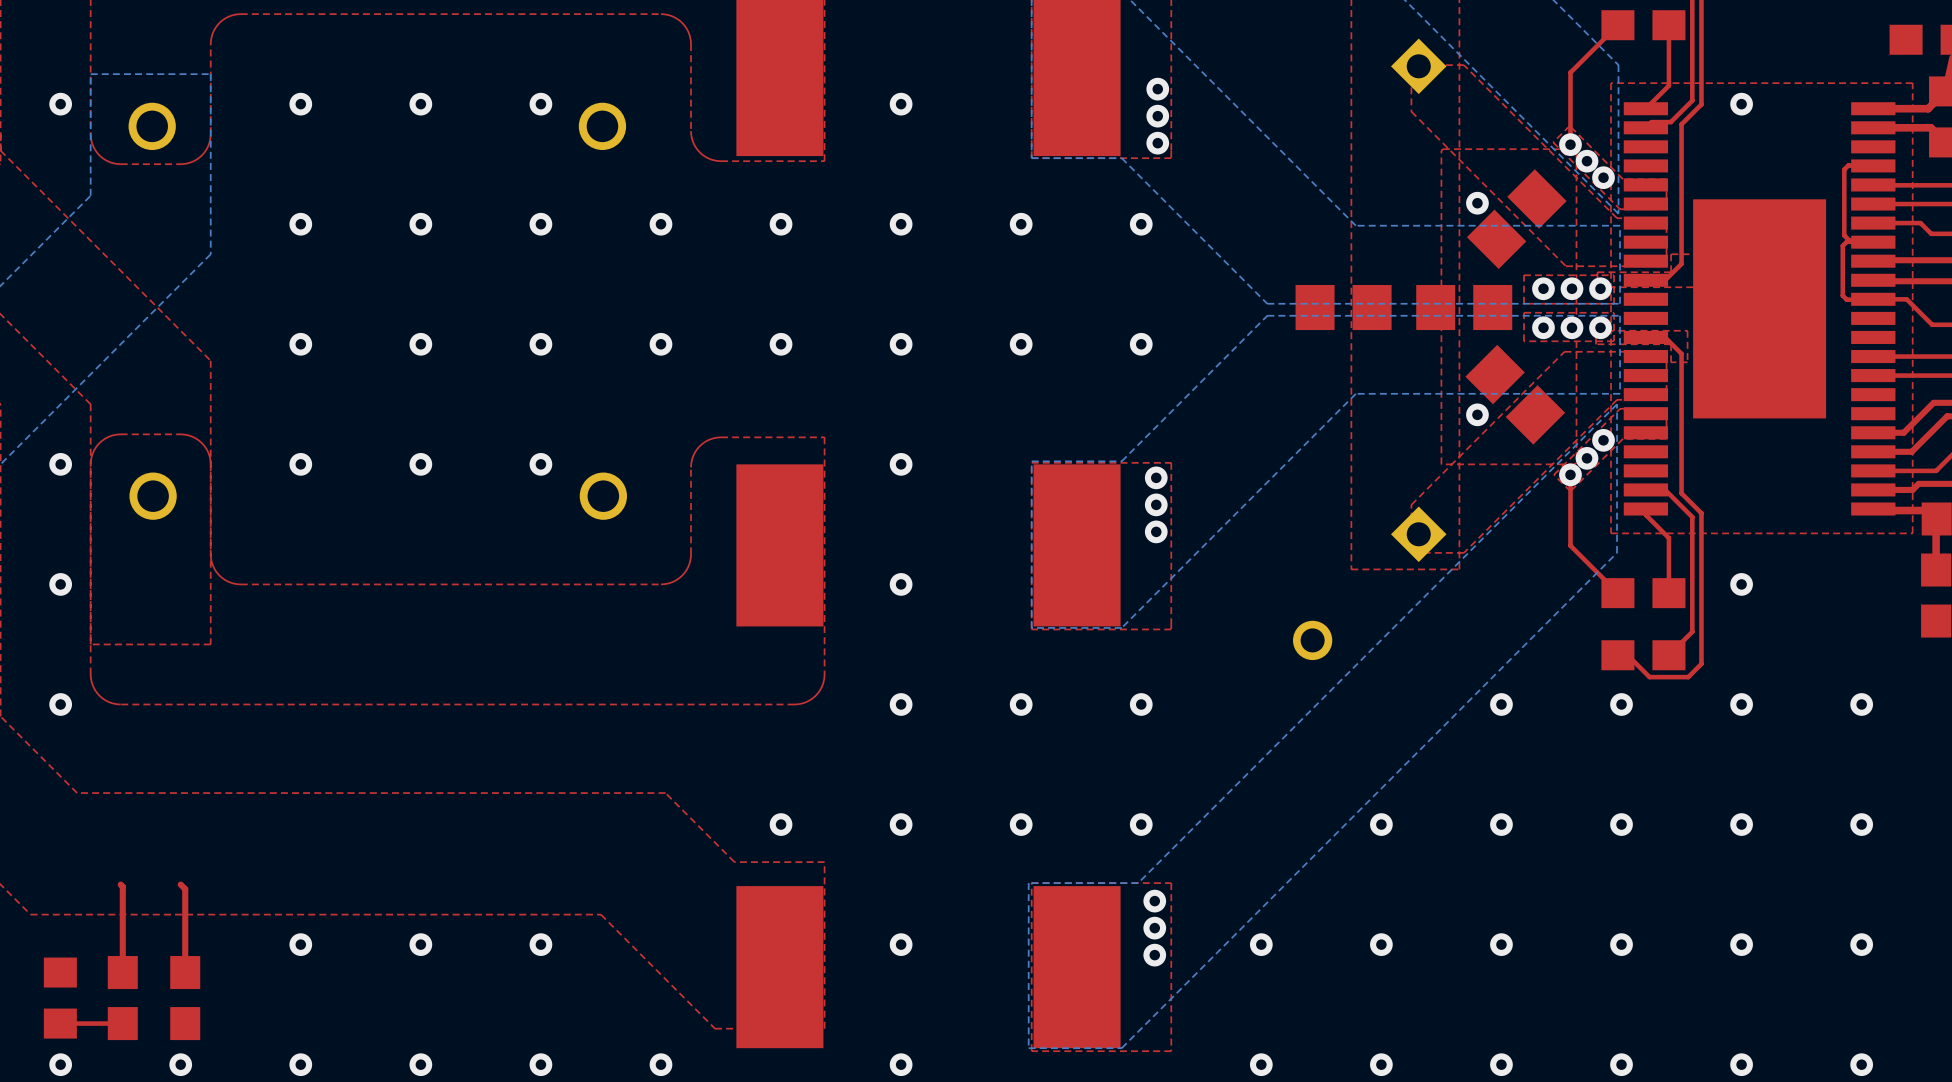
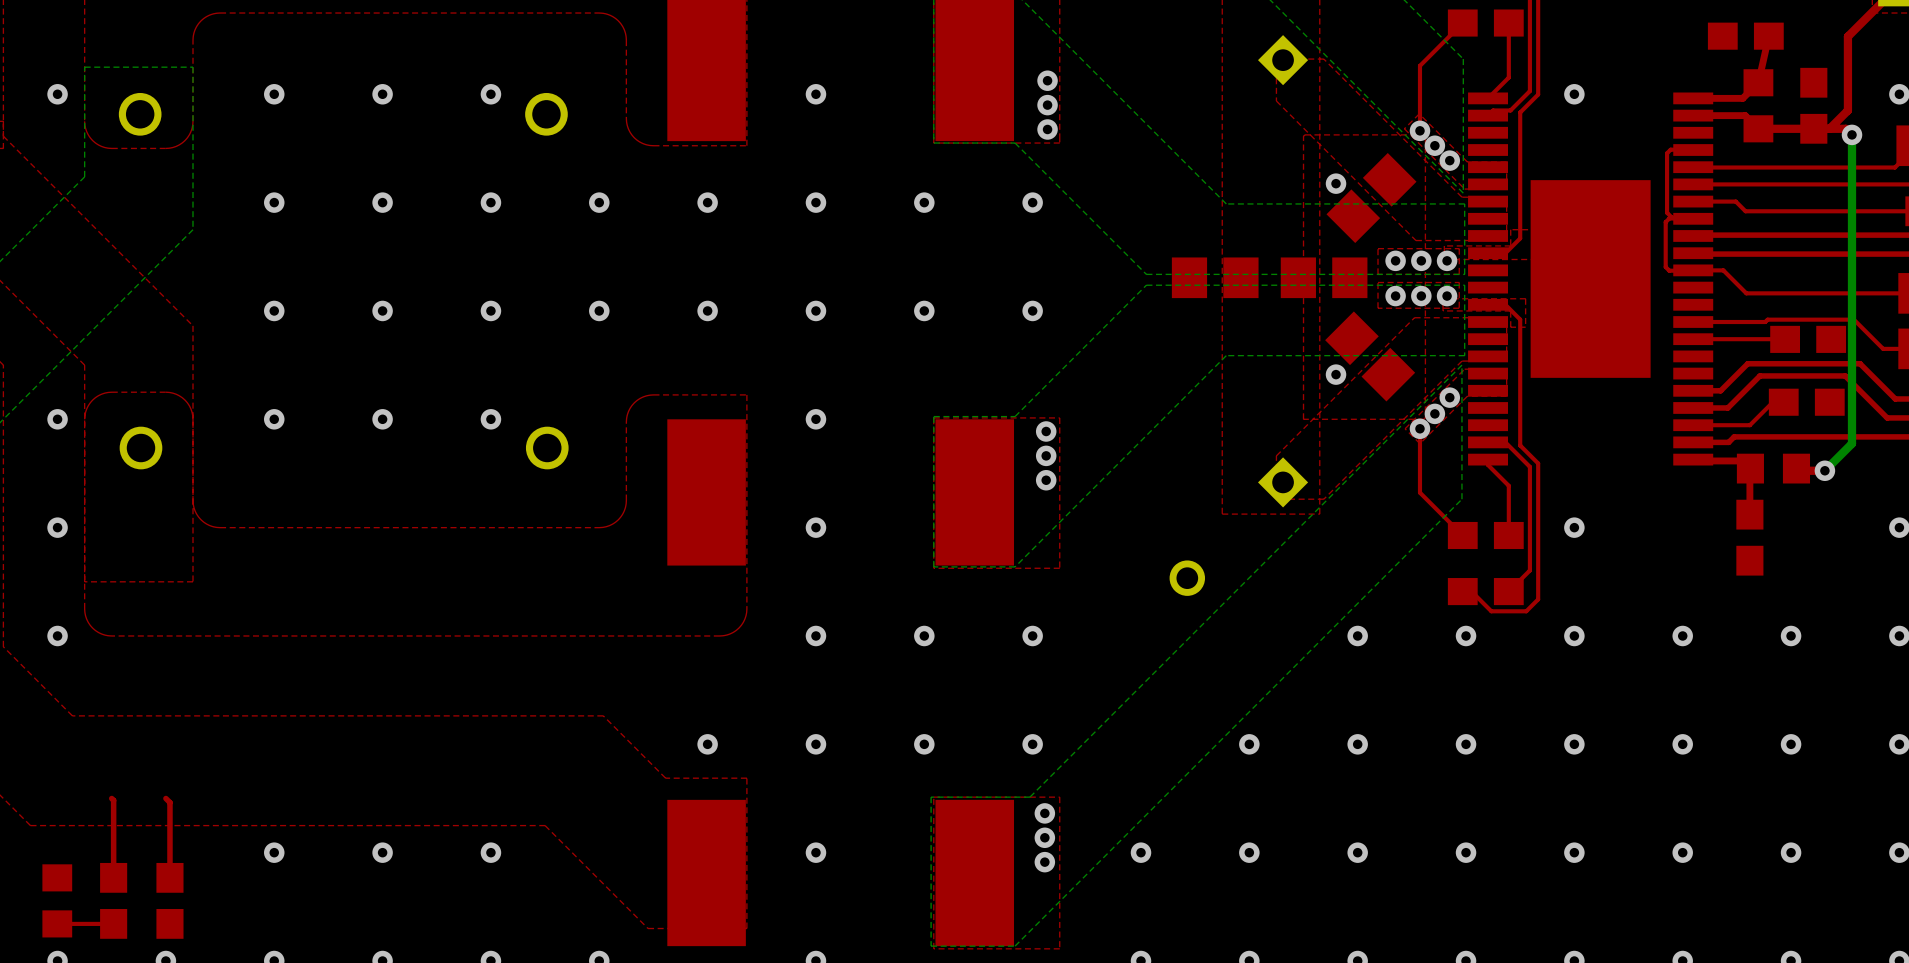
top zone outline: (1912, 83) (1611, 83) (1611, 533) (1912, 533) (1912, 83) -> none

